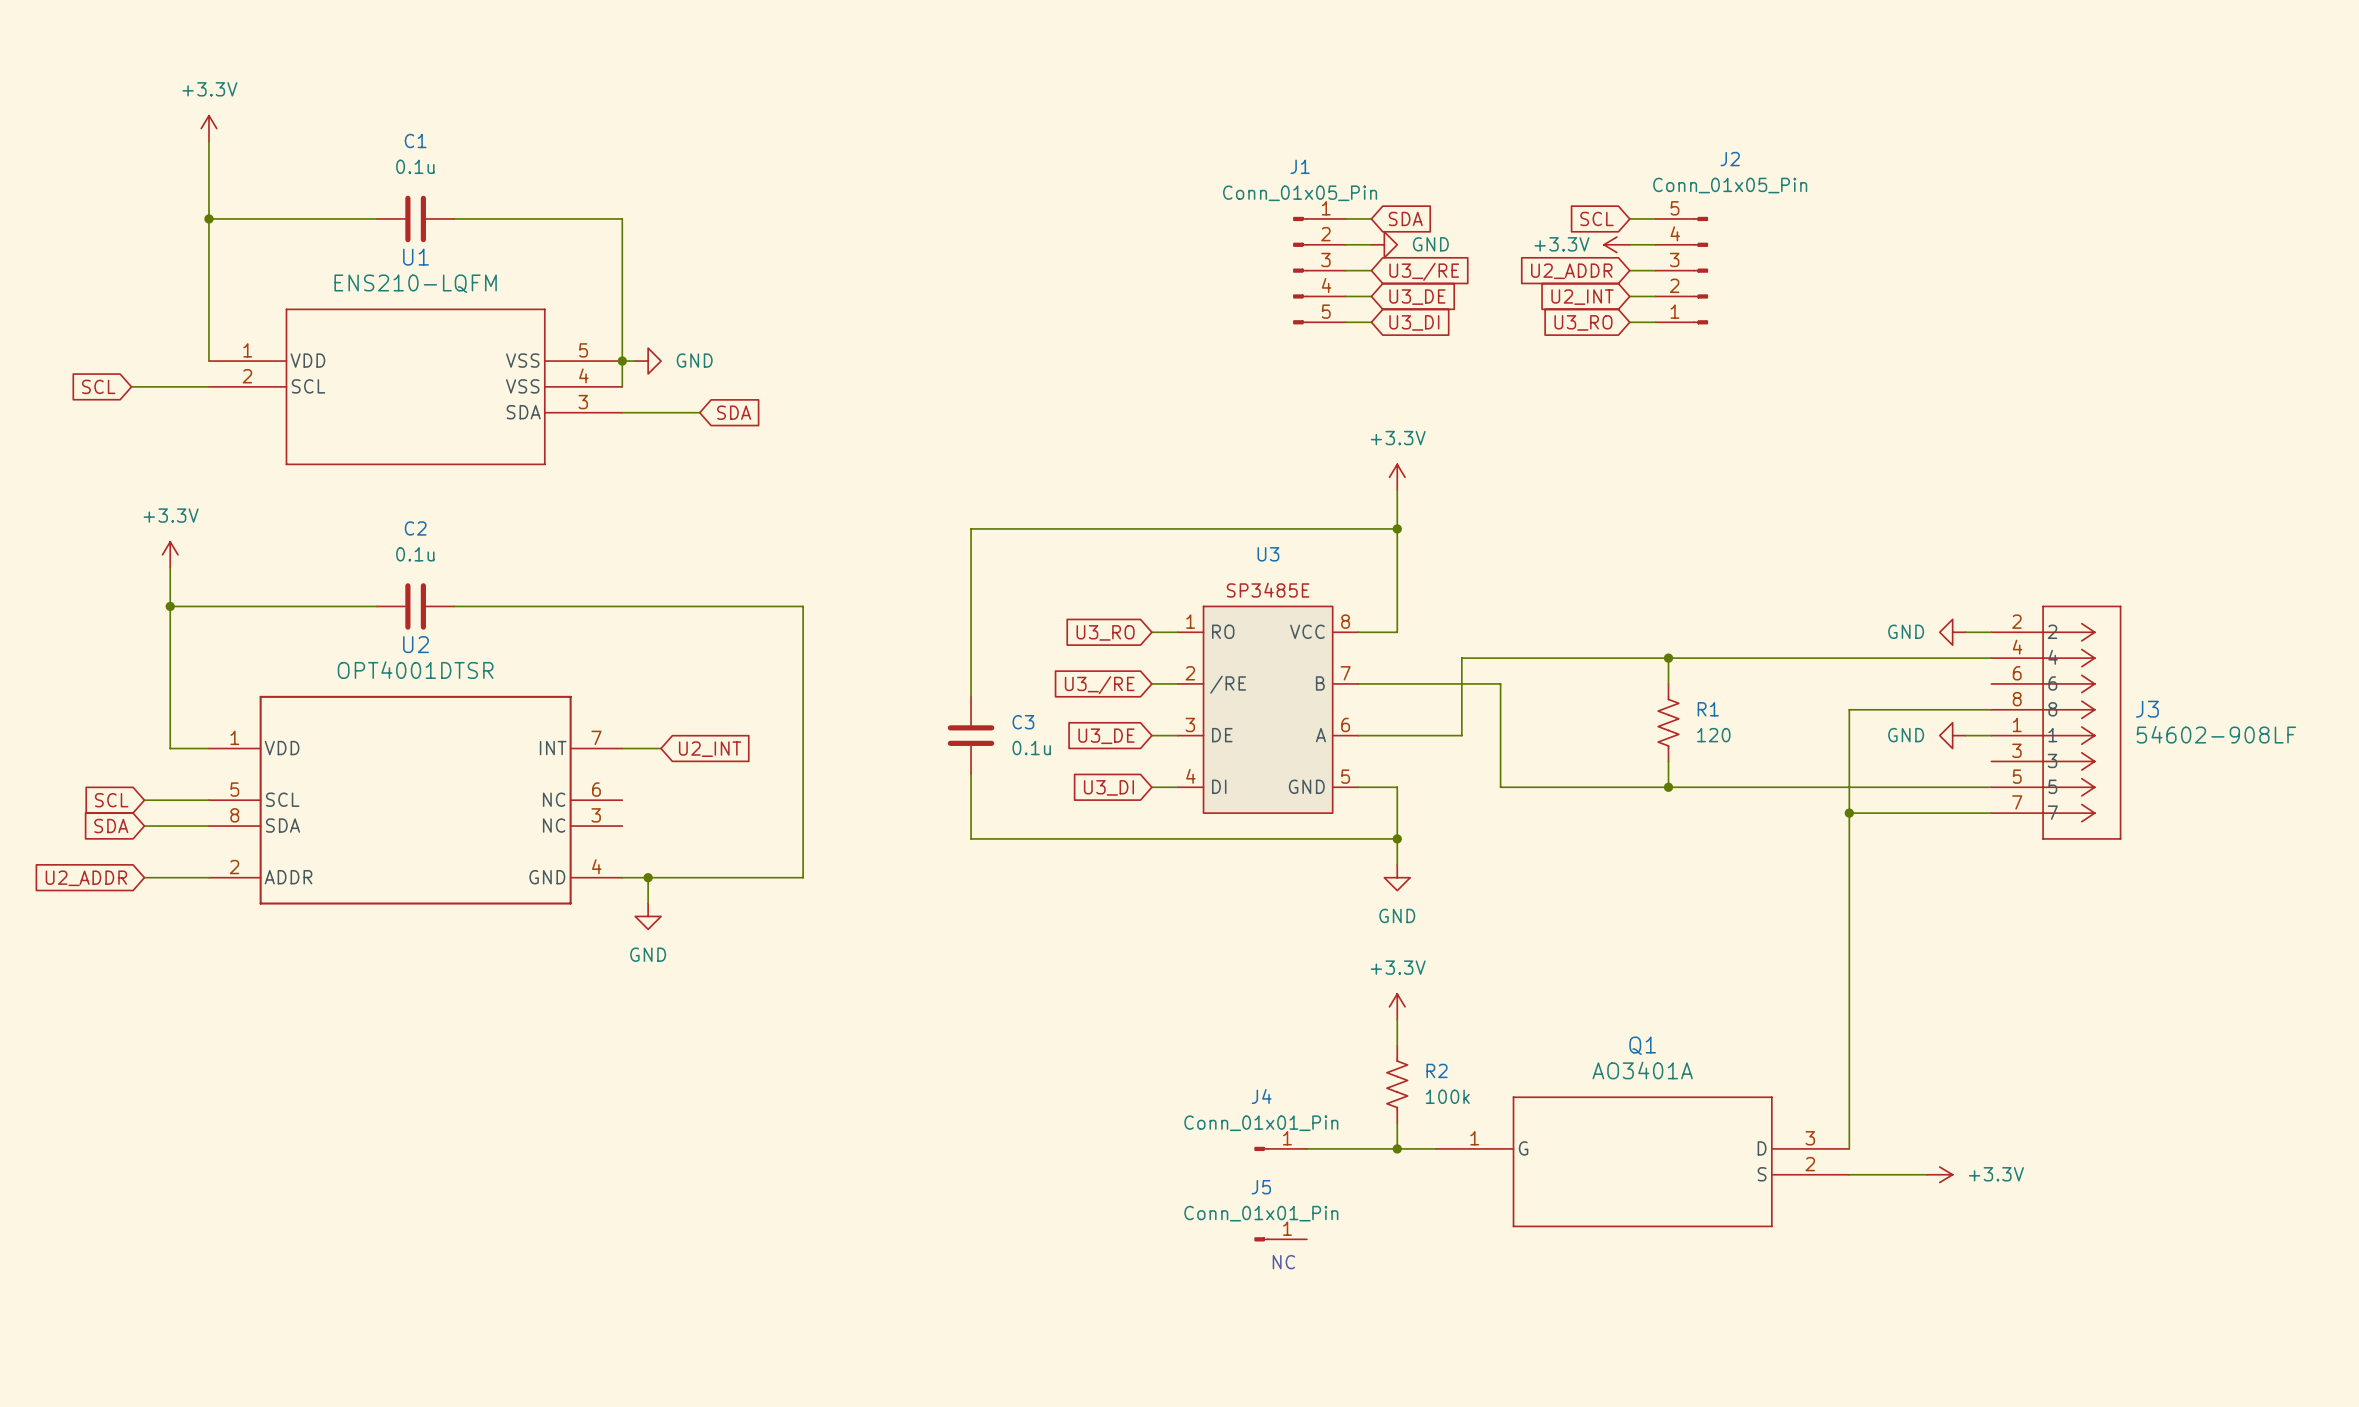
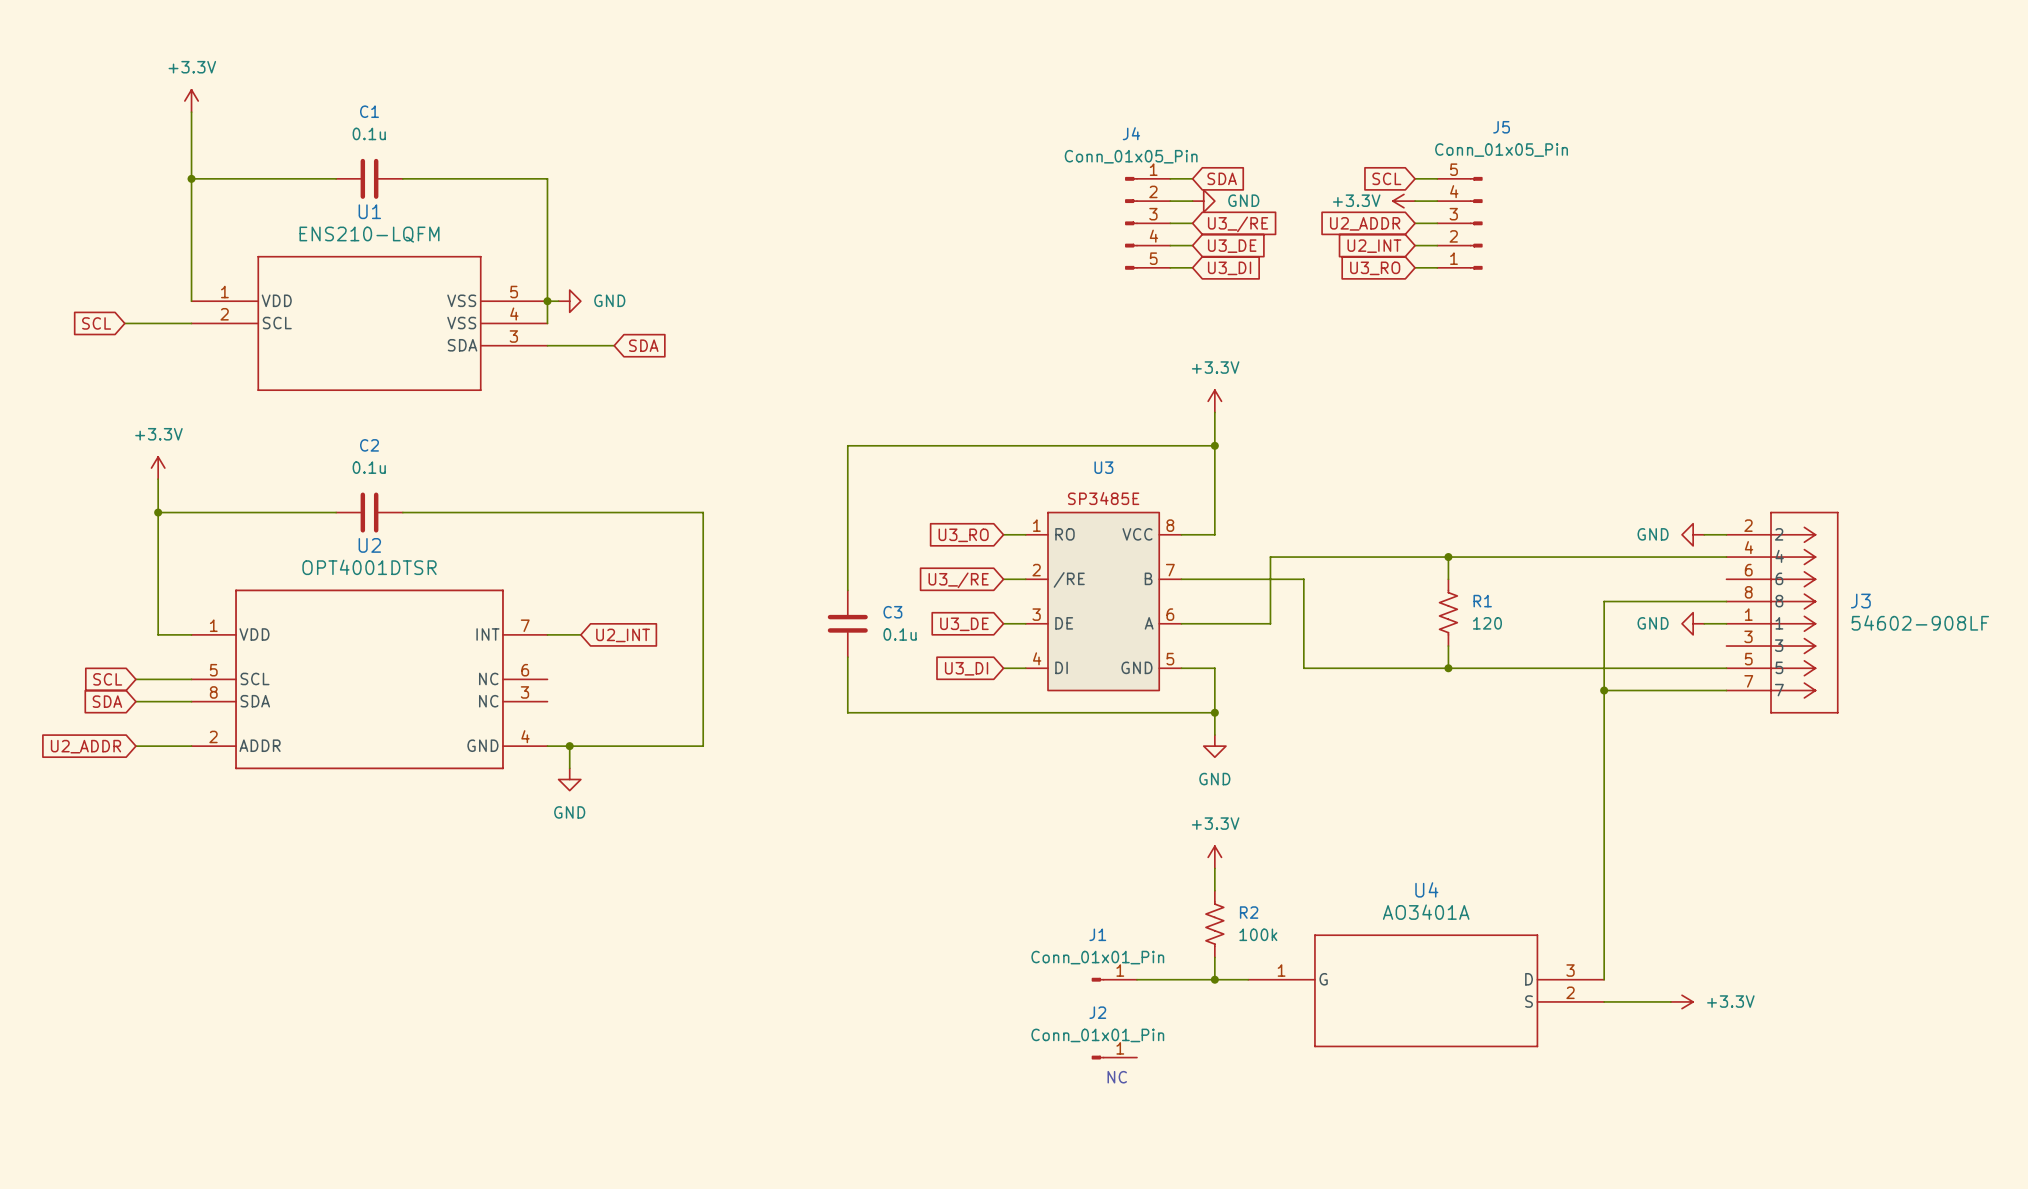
J2 name: J2 (1730, 159) -> J5 (1501, 127)
J1 name: J1 (1300, 166) -> J4 (1131, 133)
Q1 name: Q1 (1642, 1045) -> U4 (1426, 889)
J4 name: J4 (1261, 1096) -> J1 (1097, 934)
J5 name: J5 (1261, 1187) -> J2 (1097, 1012)

